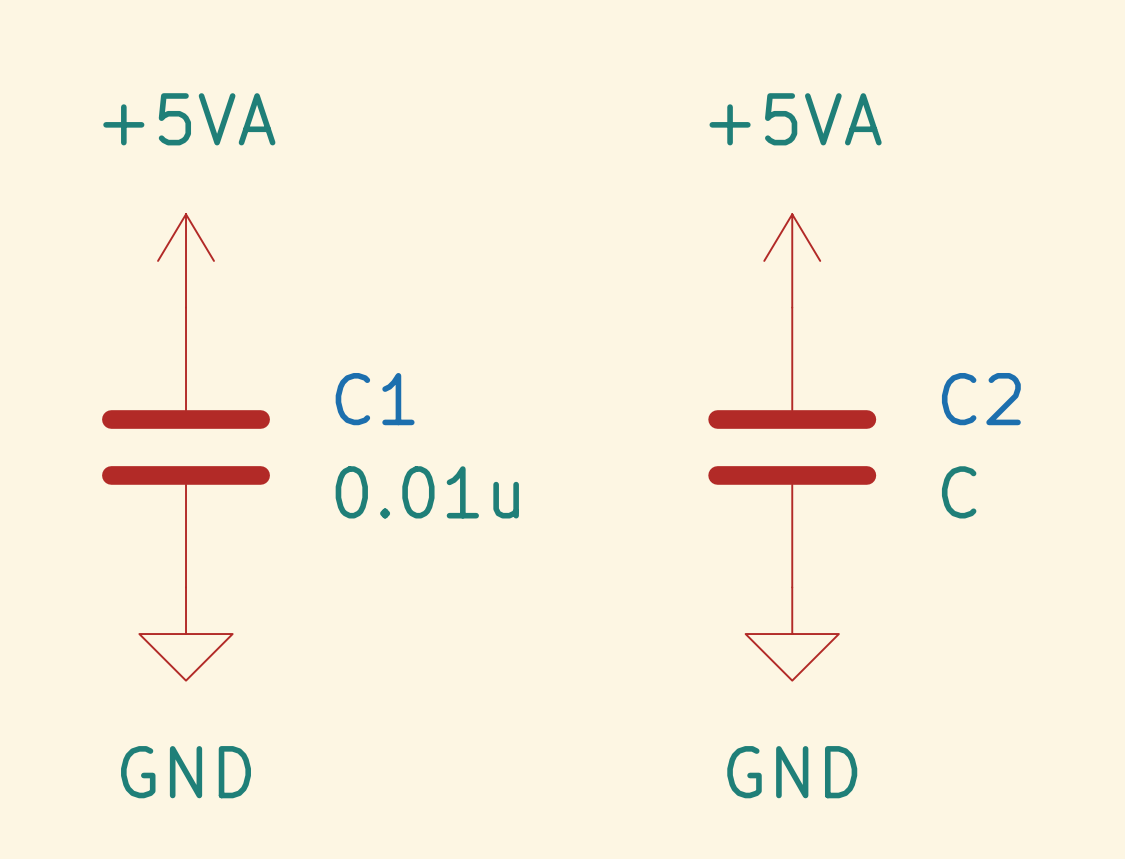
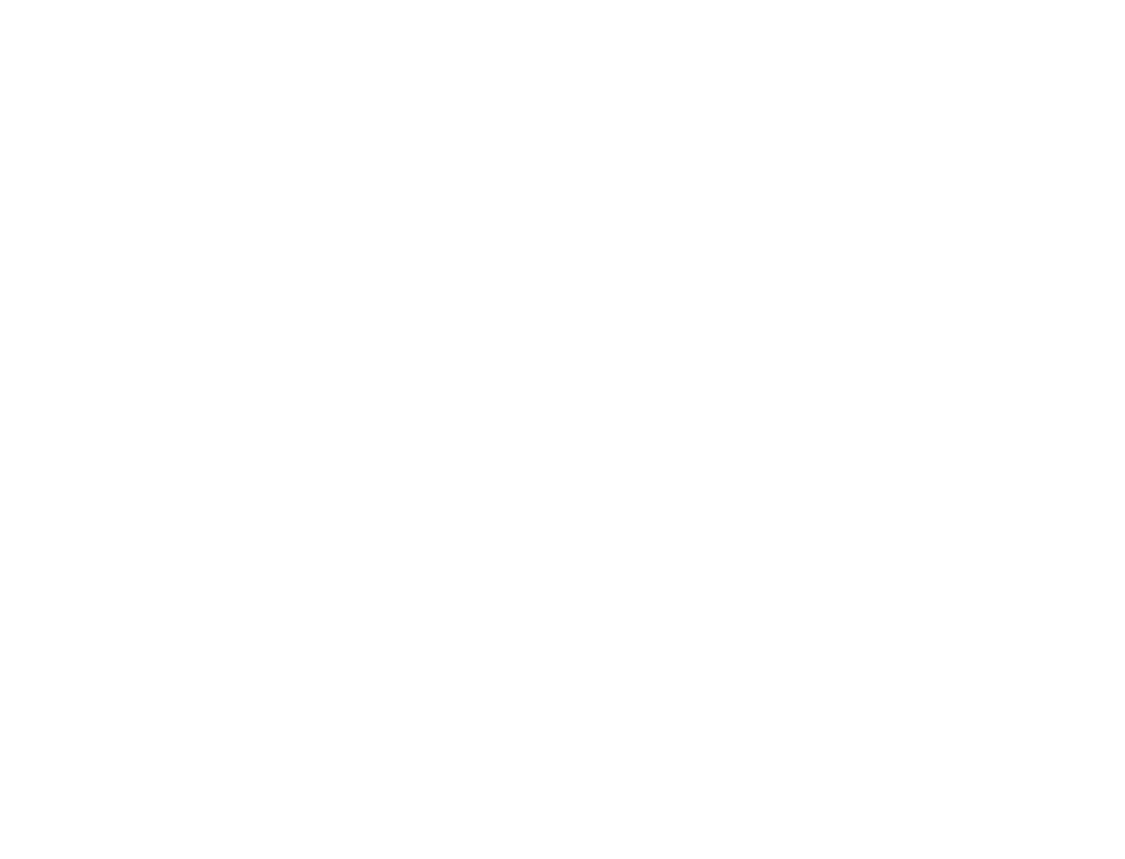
power symbol: +5VA (186, 260) -> none
power symbol: +5VA (792, 260) -> none
C1: 0.01u (186, 447) -> none
C2: C (792, 447) -> none
power symbol: GND (186, 634) -> none
power symbol: GND (792, 634) -> none

